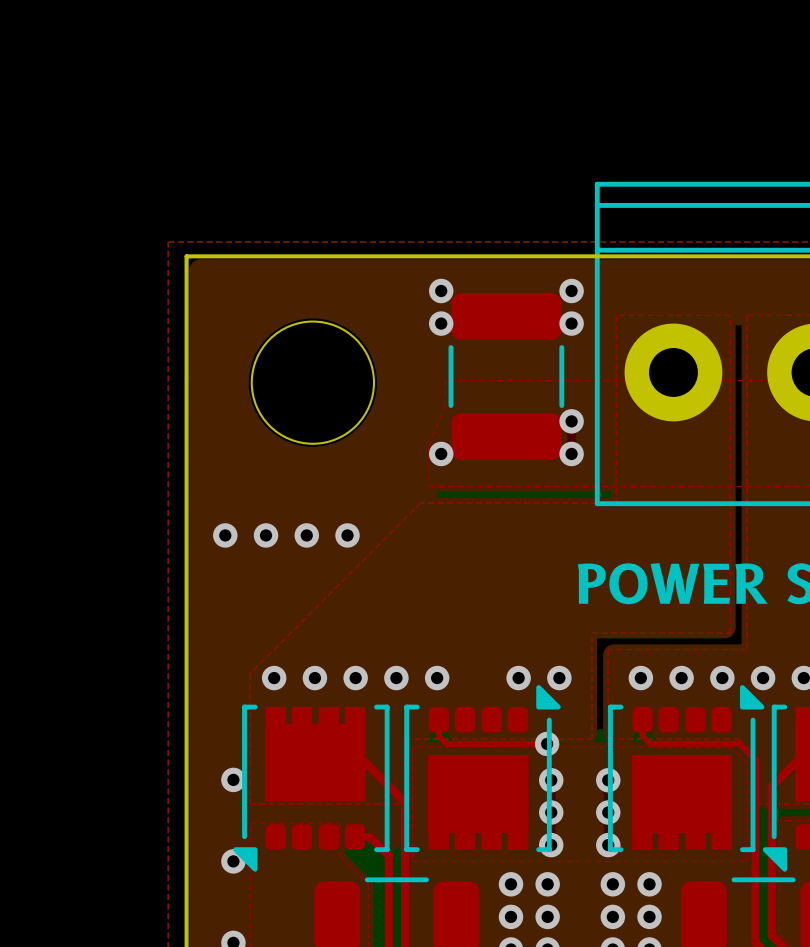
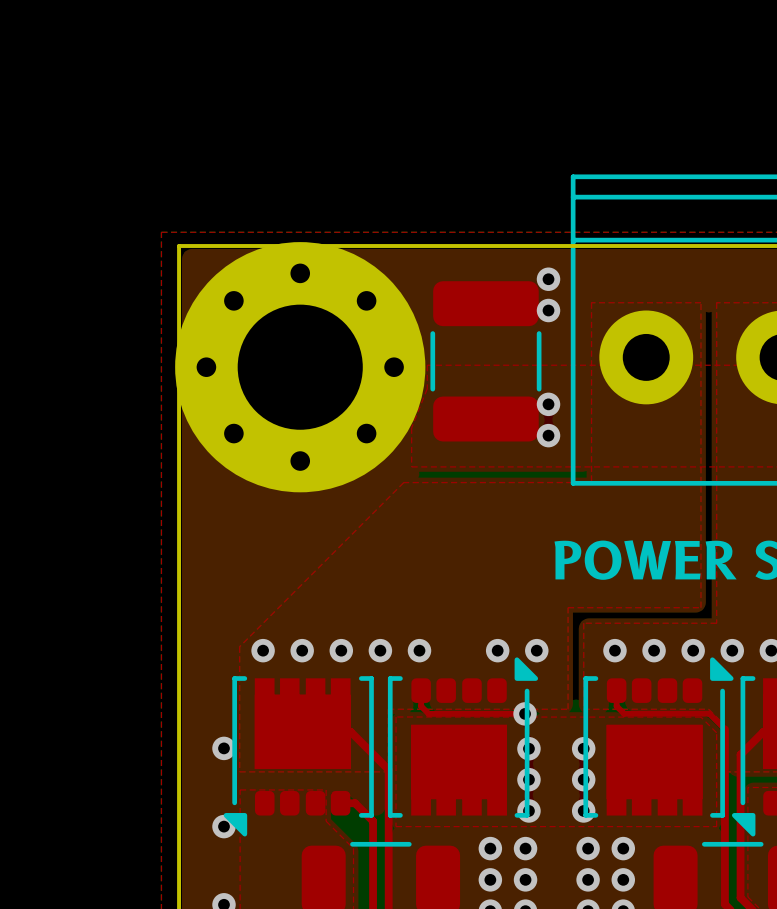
via: (441, 290) -> none
round board edge: [250, 320, 376, 445] -> none
via: (441, 323) -> none
part: none -> (300, 367)
via: (441, 453) -> none
via: (225, 535) -> none
via: (266, 535) -> none
via: (306, 535) -> none
via: (347, 535) -> none

